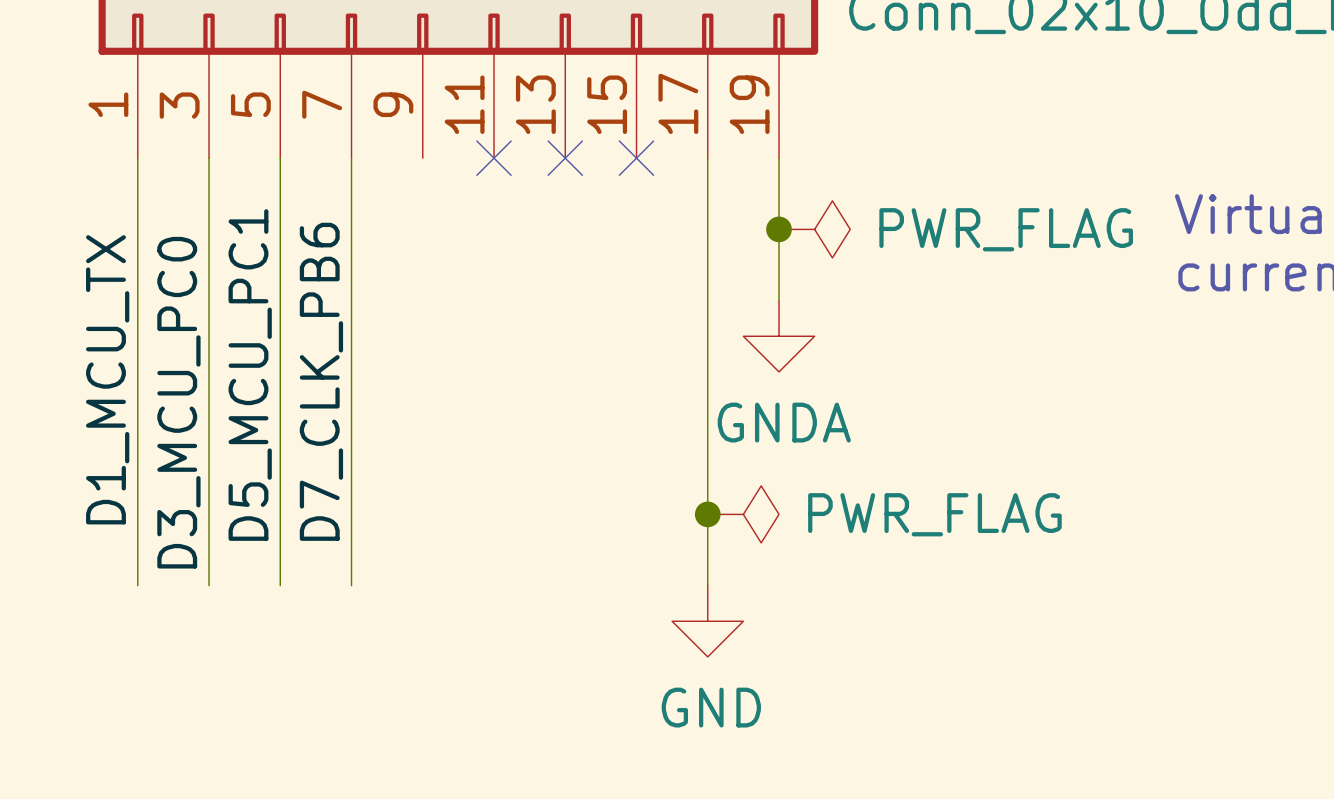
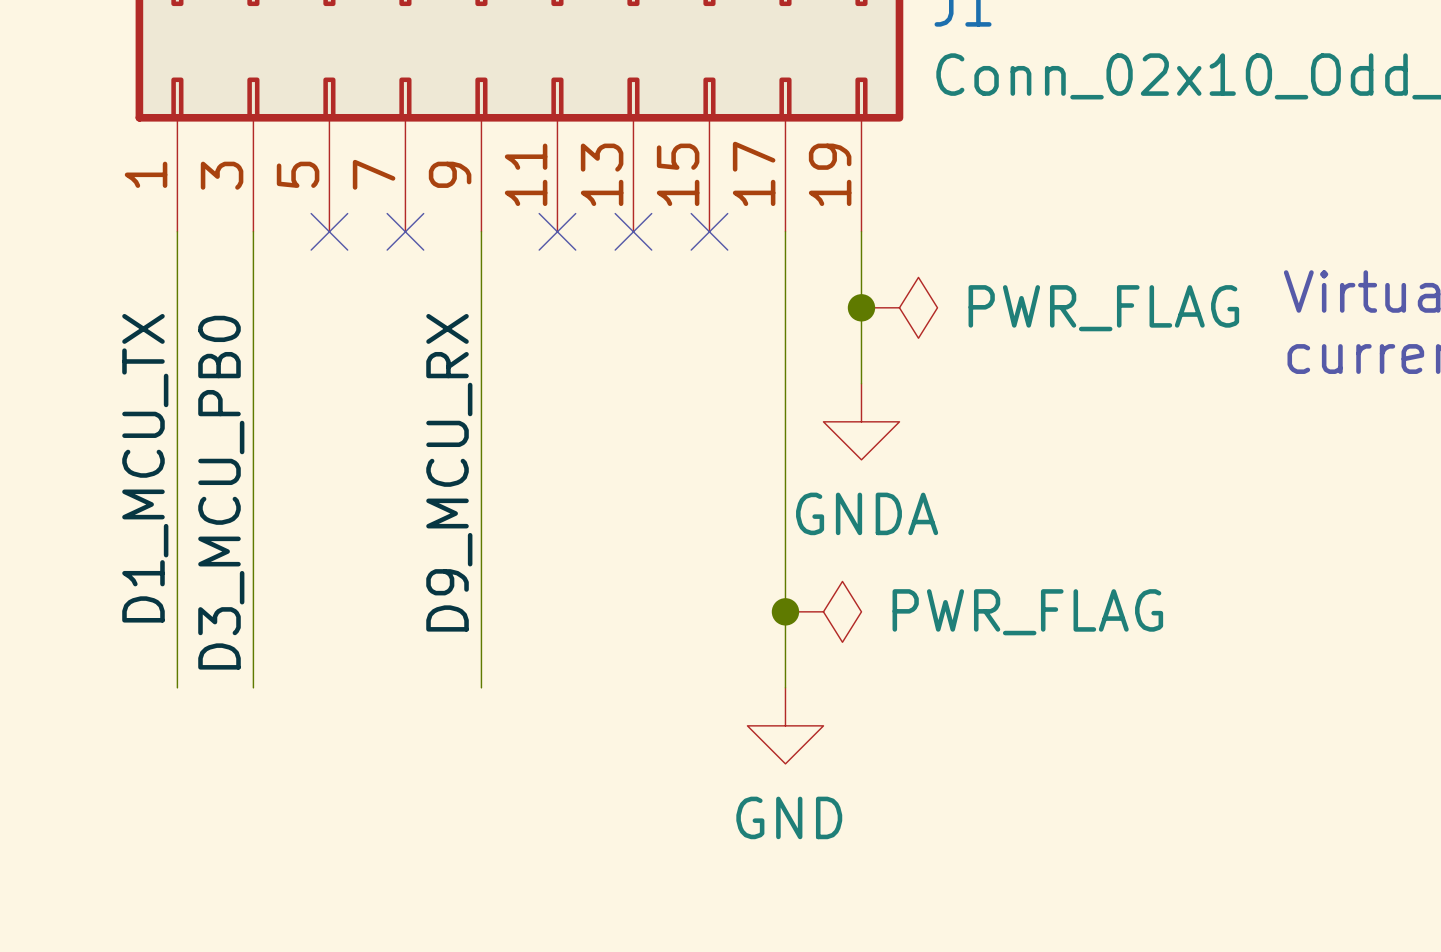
wire: (280, 158) (280, 585) -> none
no-connect mark: none -> (329, 231)
wire: (351, 158) (351, 585) -> (481, 231) (481, 687)
no-connect mark: none -> (405, 231)
label: D5_MCU_PC1 (250, 375) -> none
label: D7_CLK_PB6 (321, 381) -> none
label: none -> D9_MCU_RX (449, 472)
label: D3_MCU_PC0 (178, 402) -> D3_MCU_PB0 (221, 492)

